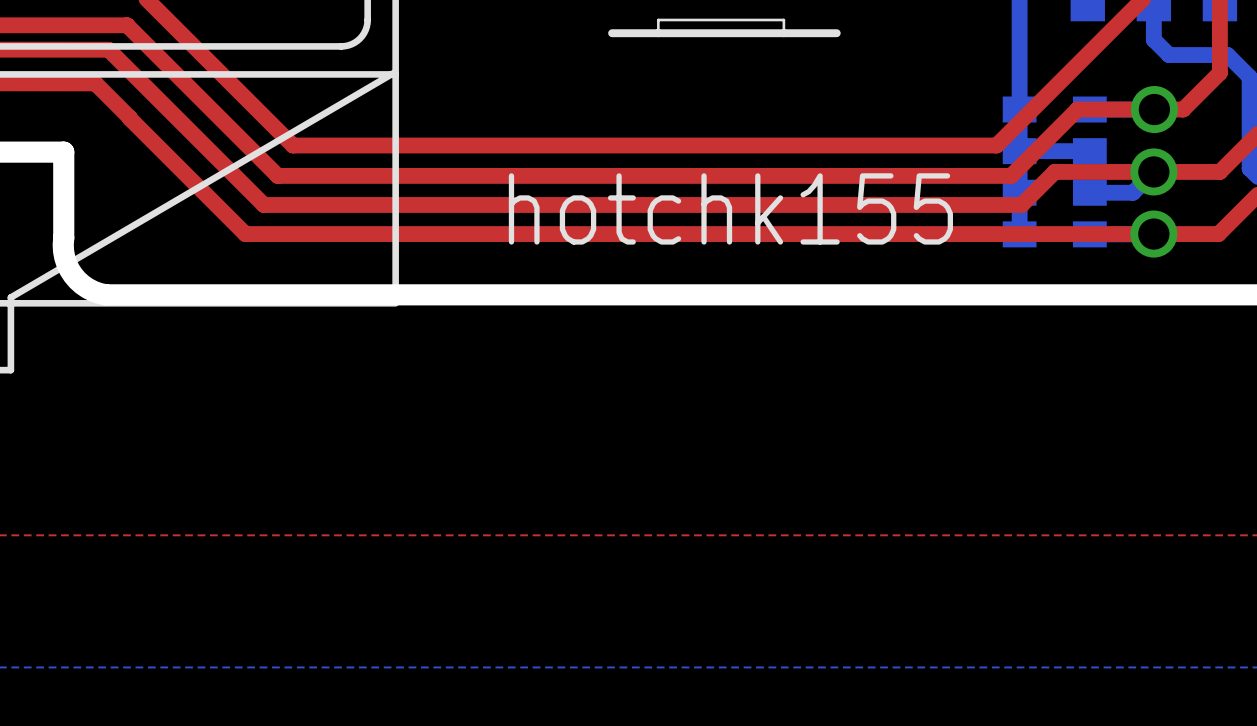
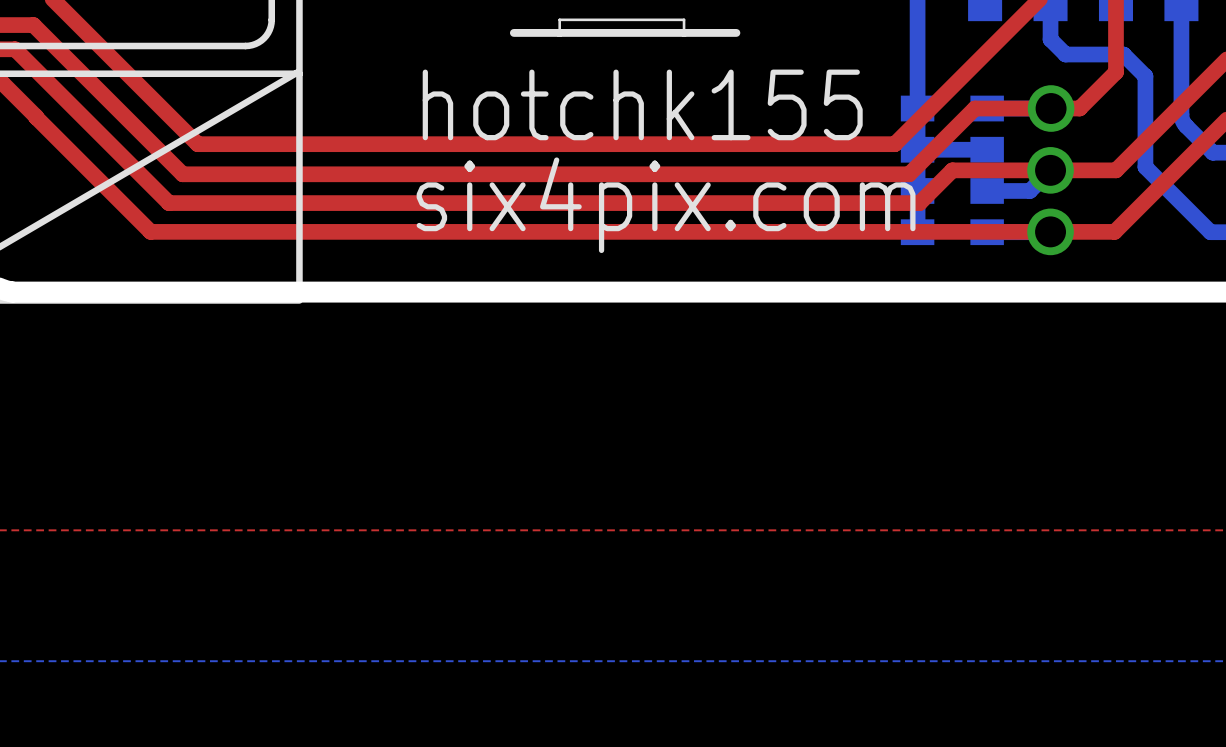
text: none -> six4pix.com (666, 205)
text position: hotchk155 (730, 208) -> hotchk155 (642, 104)

